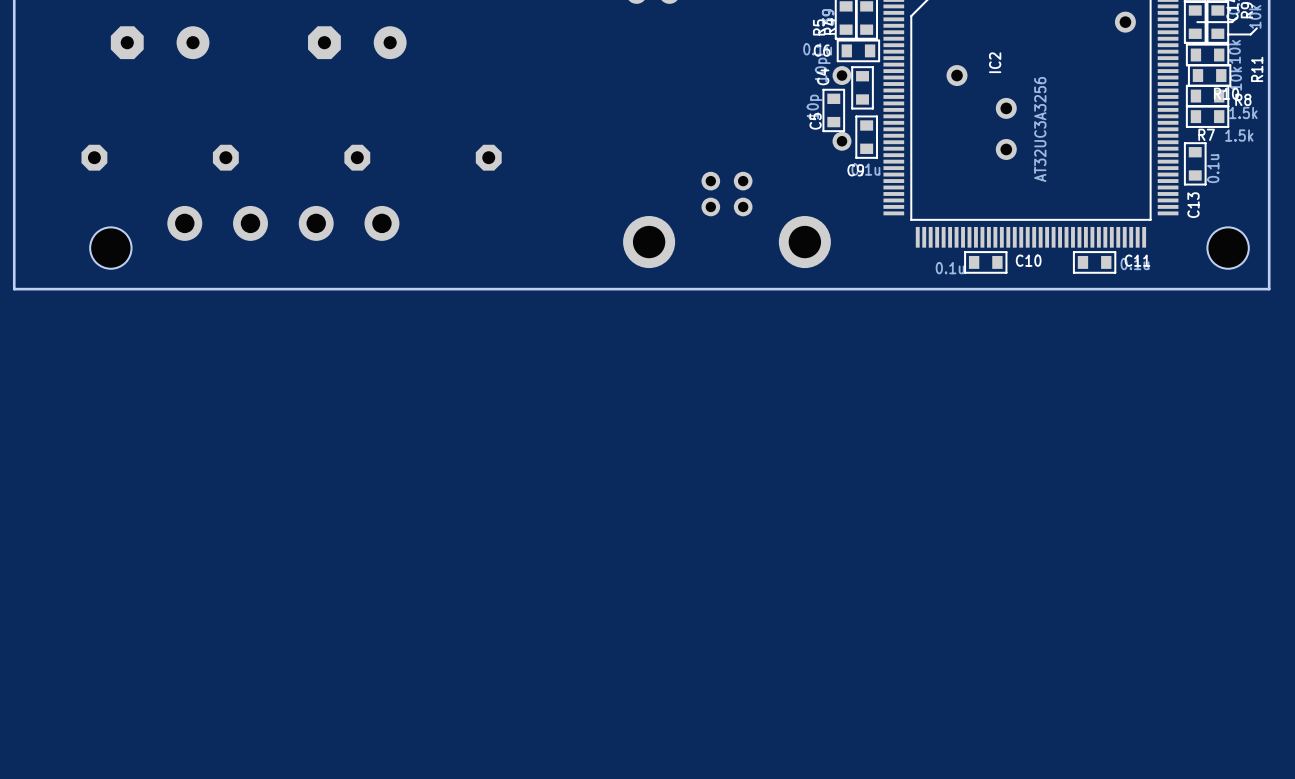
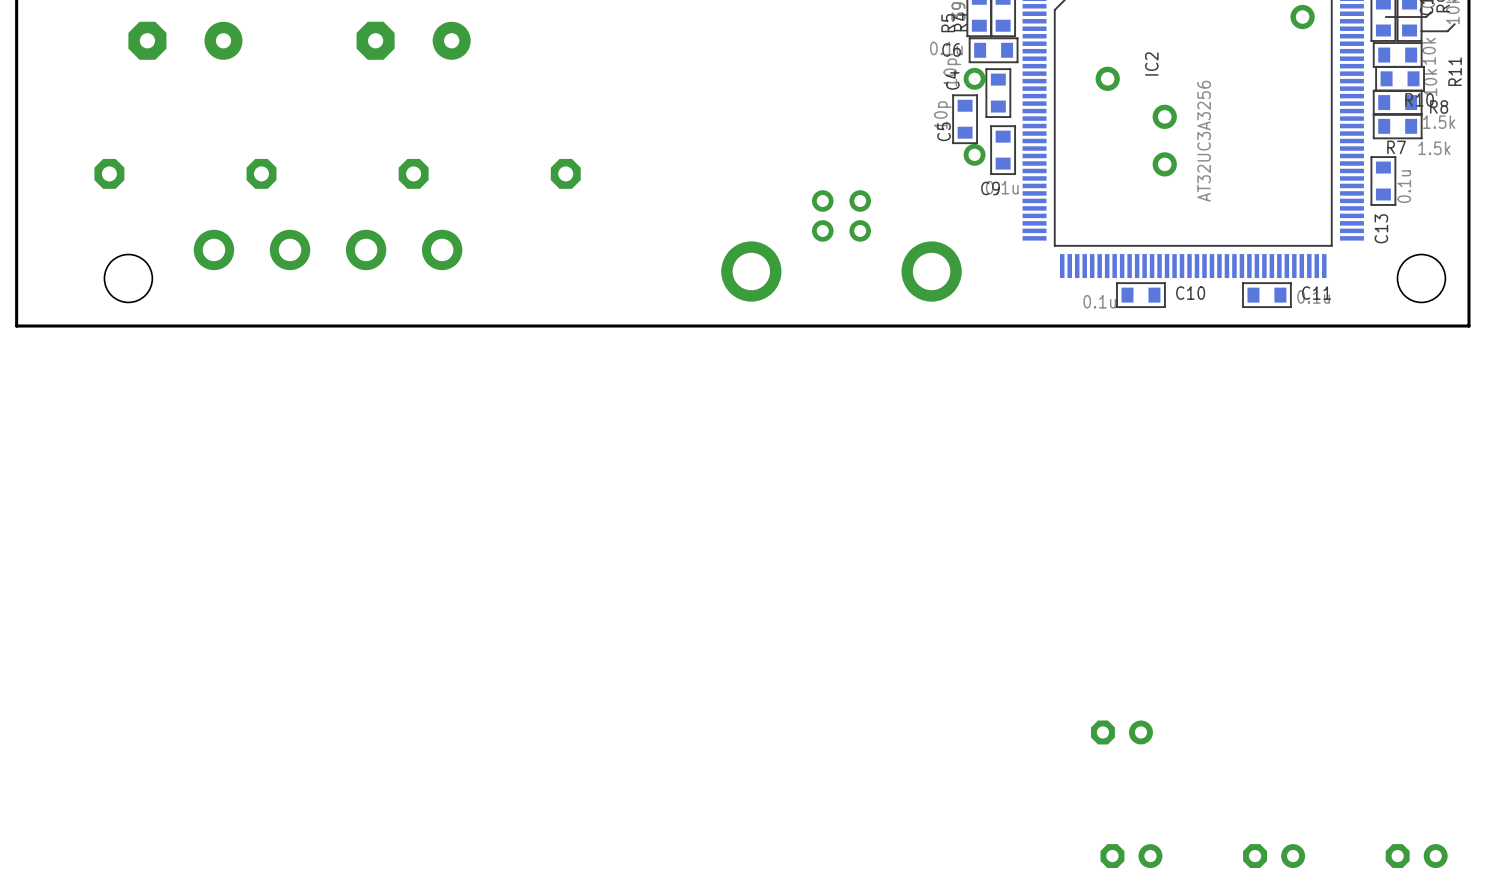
part: none -> (1121, 732)
part: none -> (1131, 856)
part: none -> (1274, 856)
part: none -> (1416, 856)

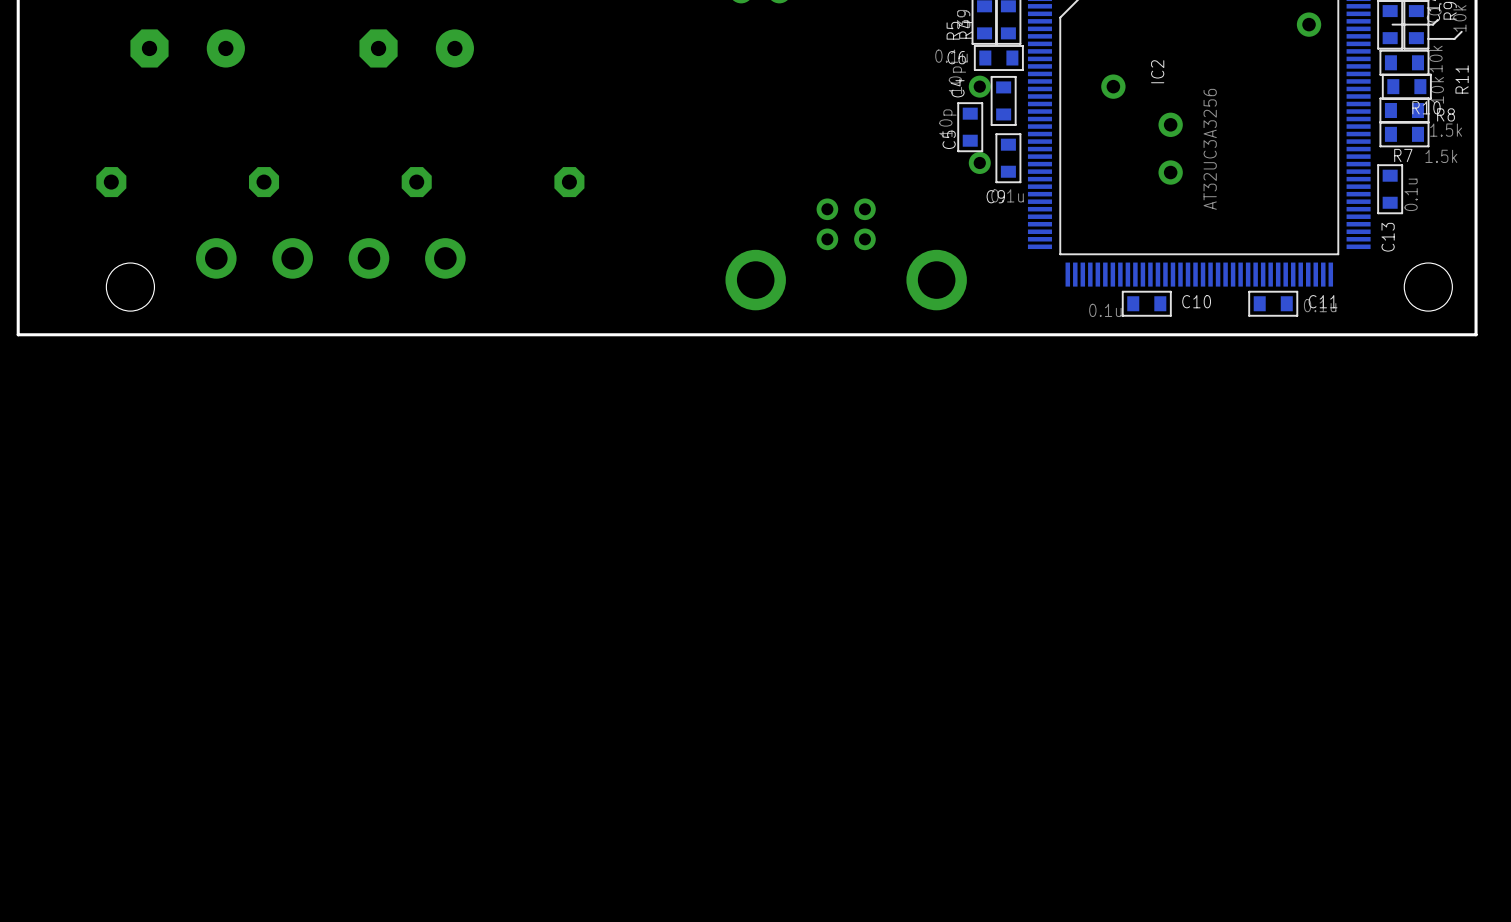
part: (1121, 732) -> none
part: (1131, 856) -> none
part: (1274, 856) -> none
part: (1416, 856) -> none

